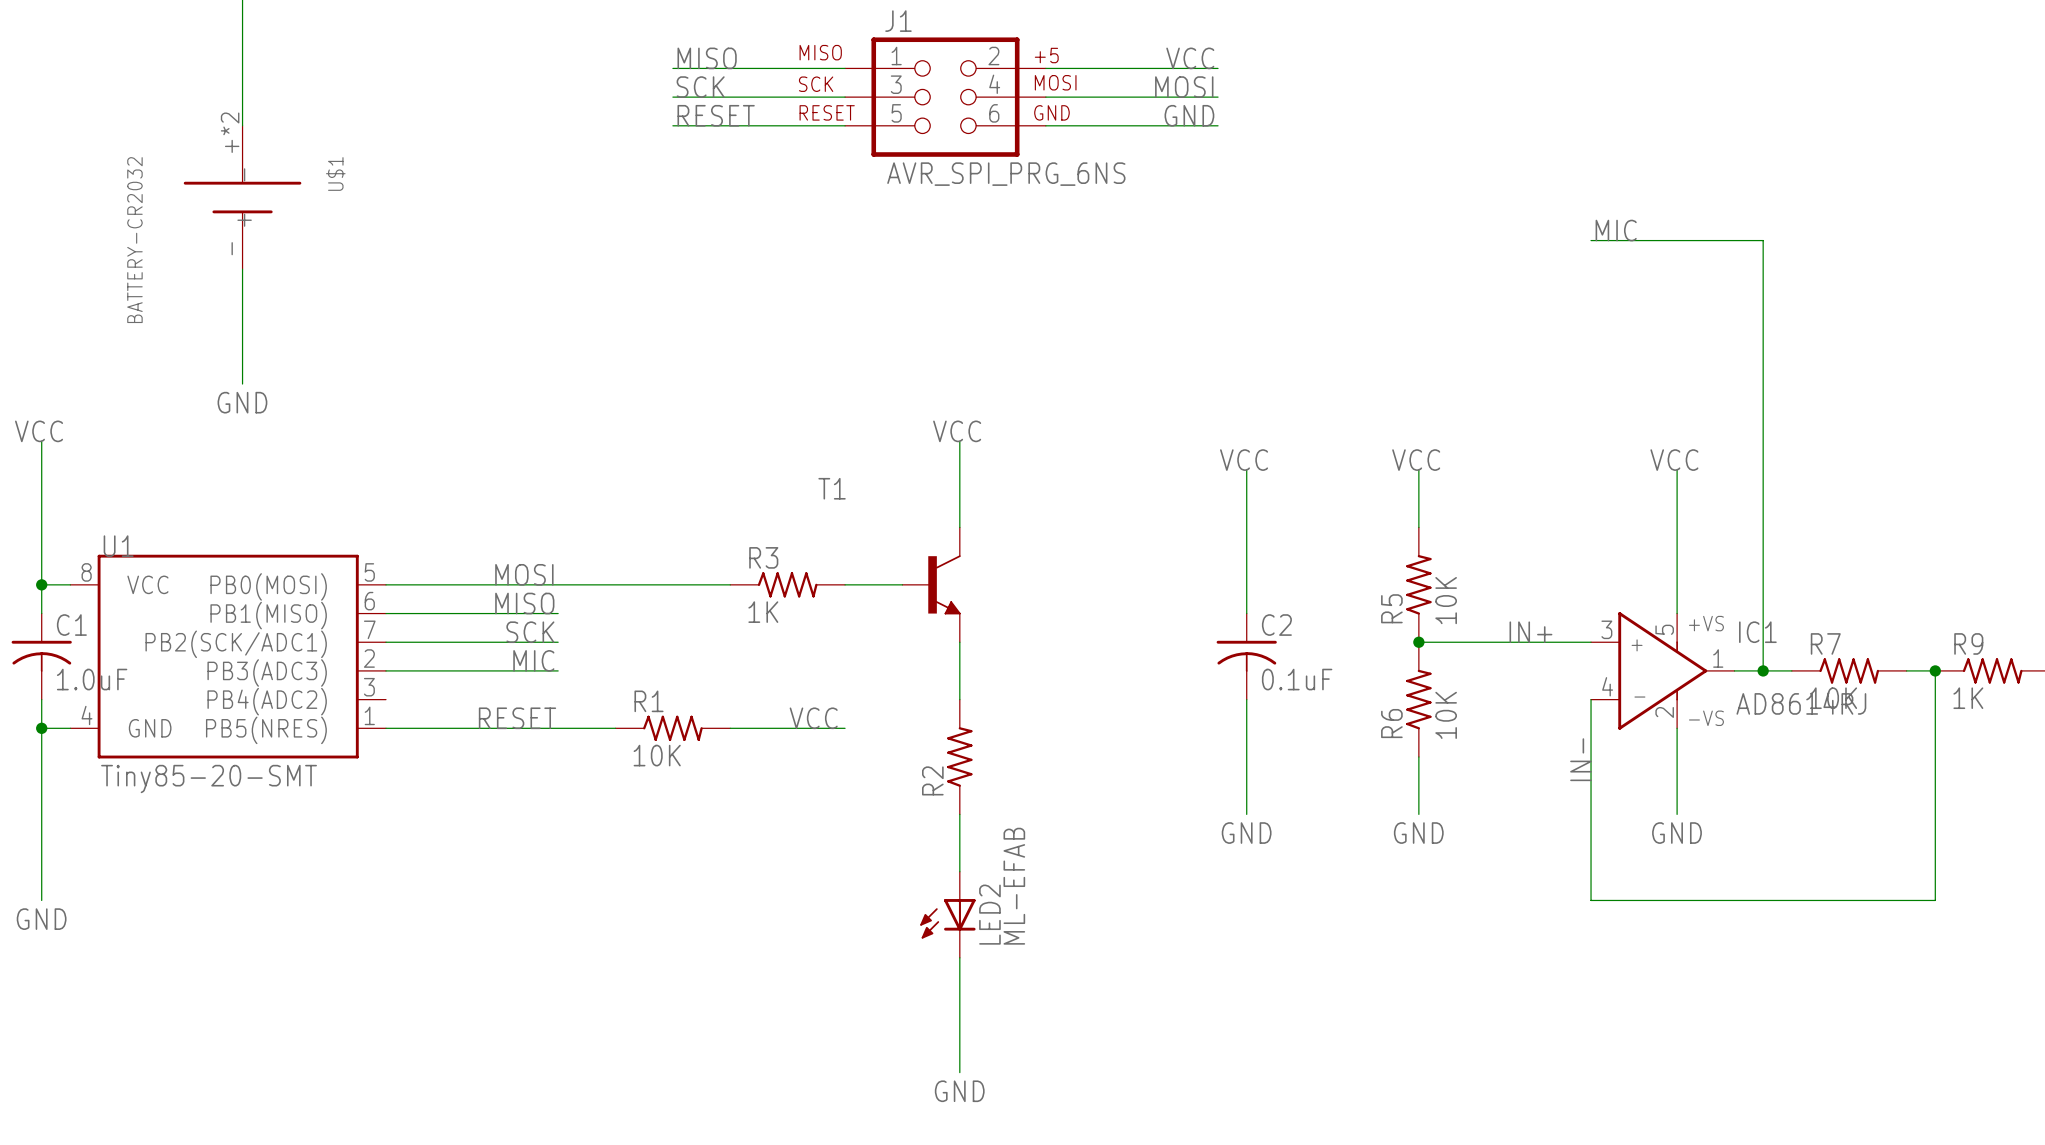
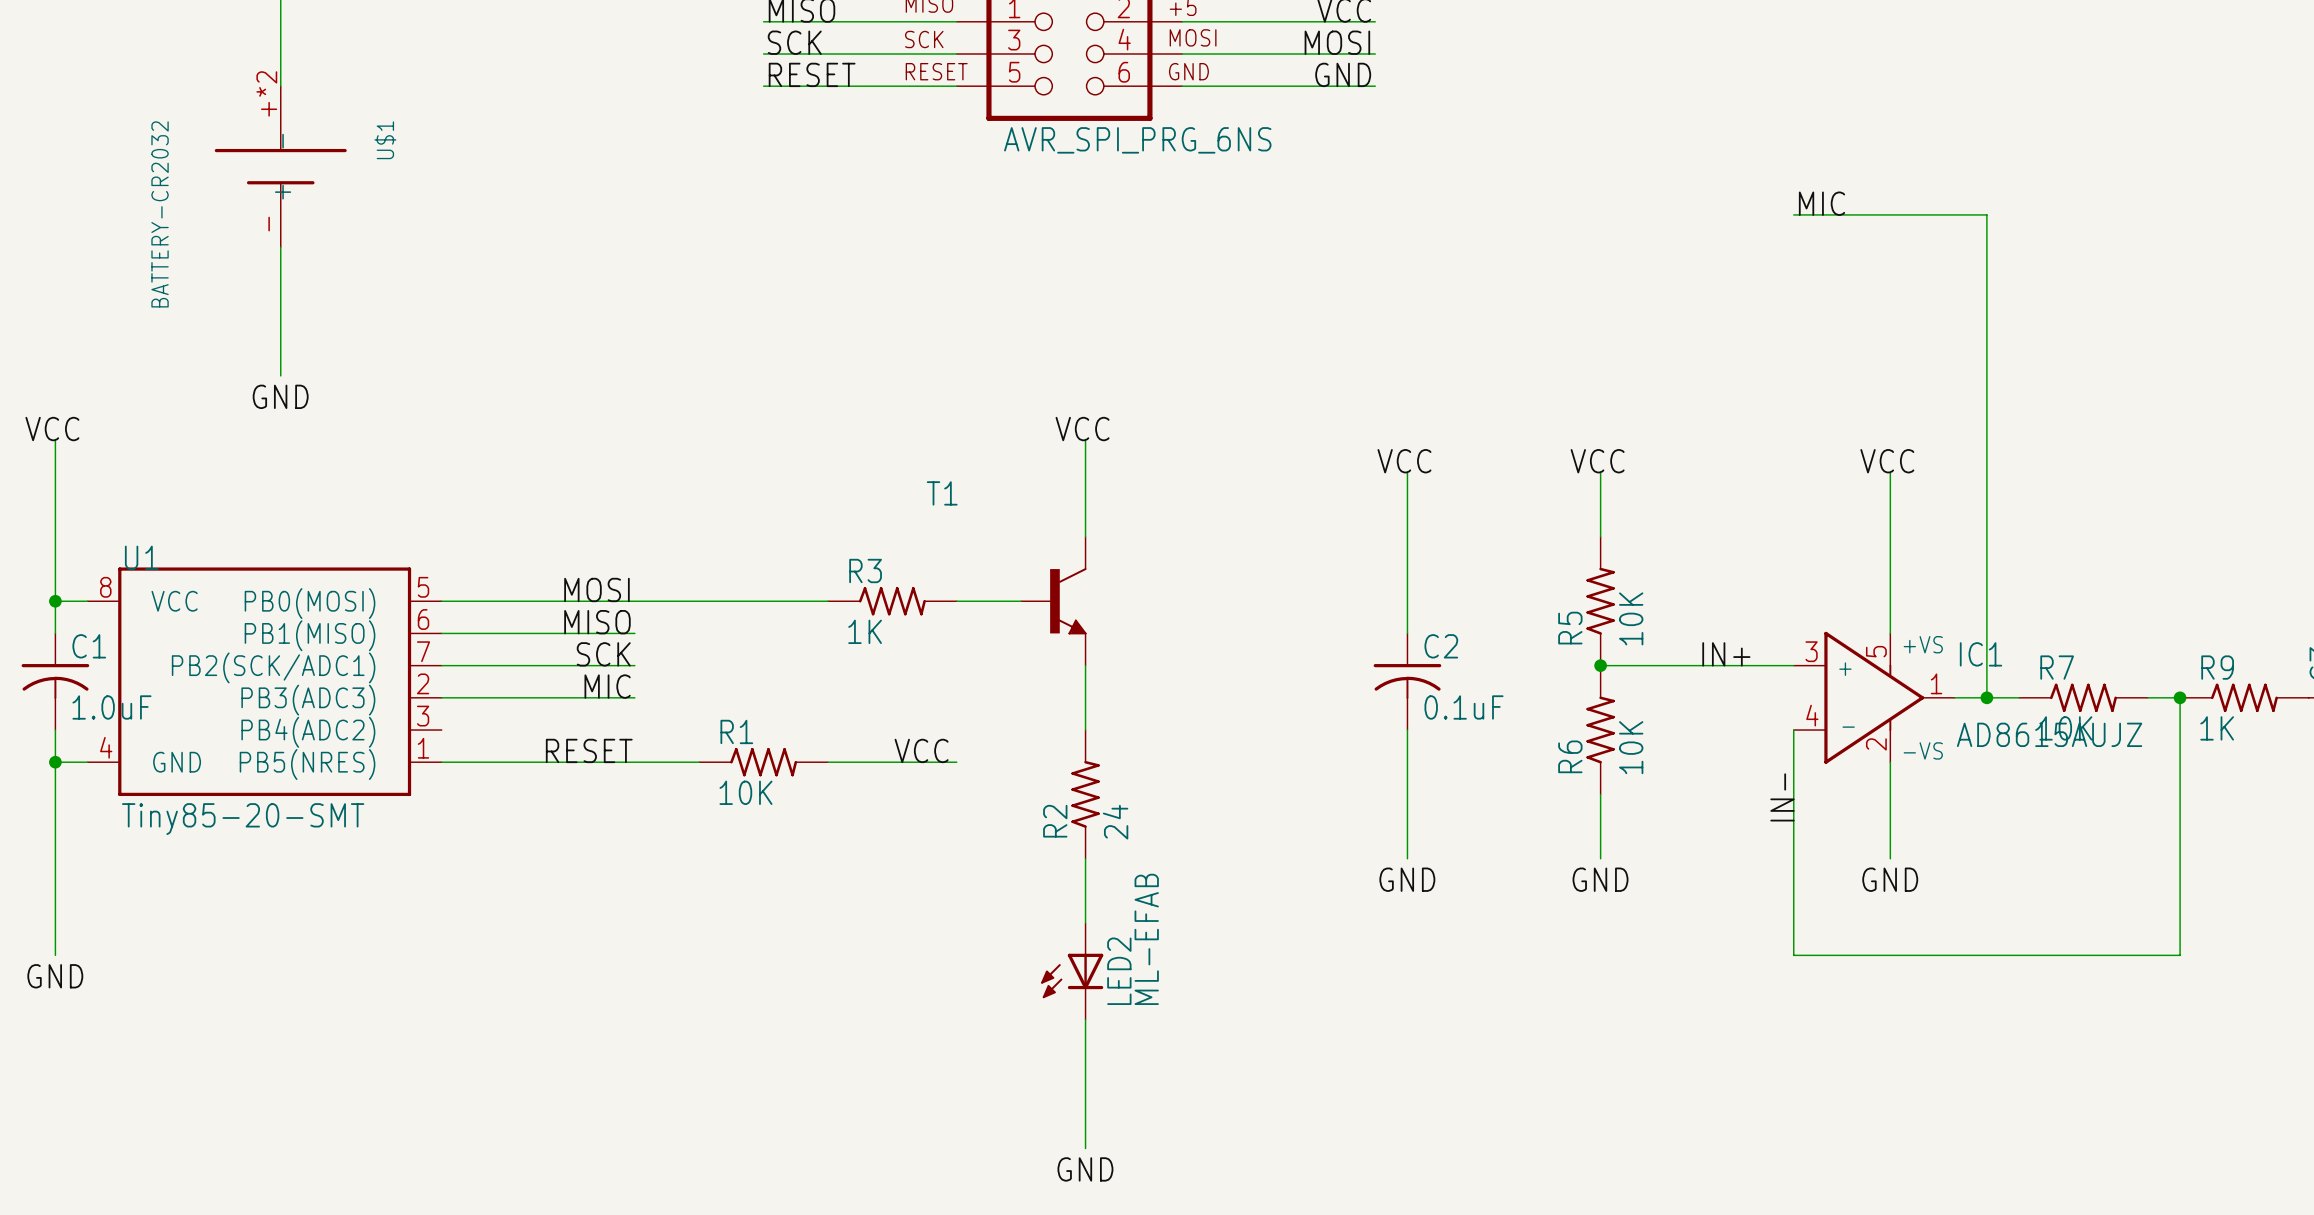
IC1 value: AD8614RJ (1801, 703) -> AD8615AUJZ (2049, 734)
R2 value: none -> 24 (1115, 822)

